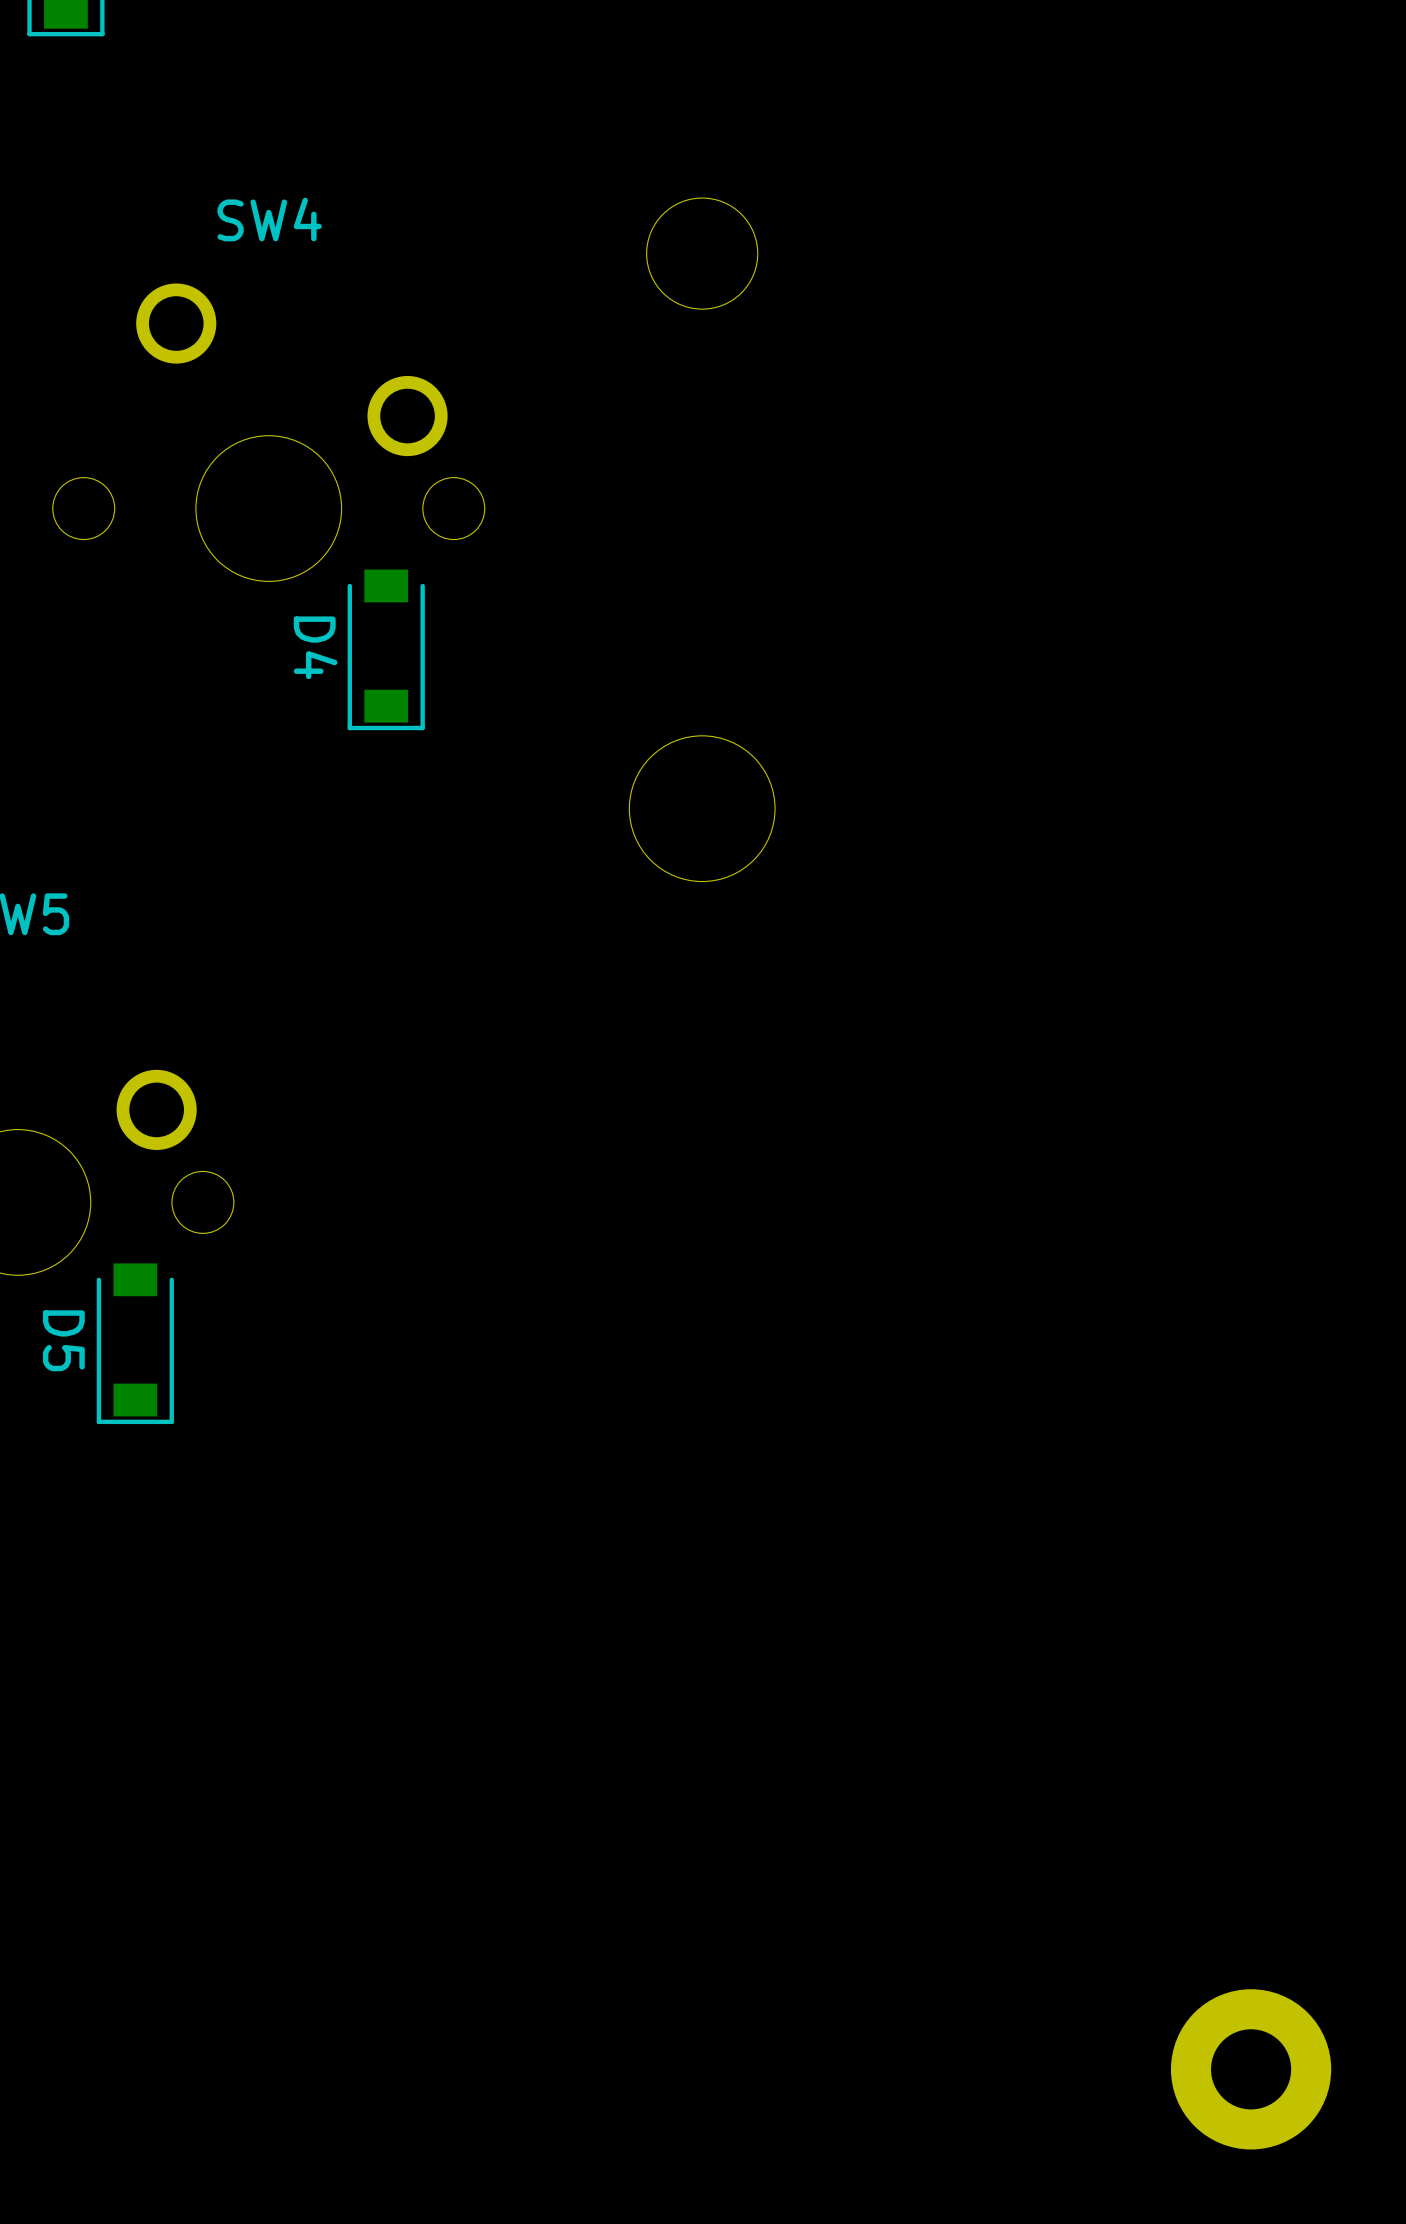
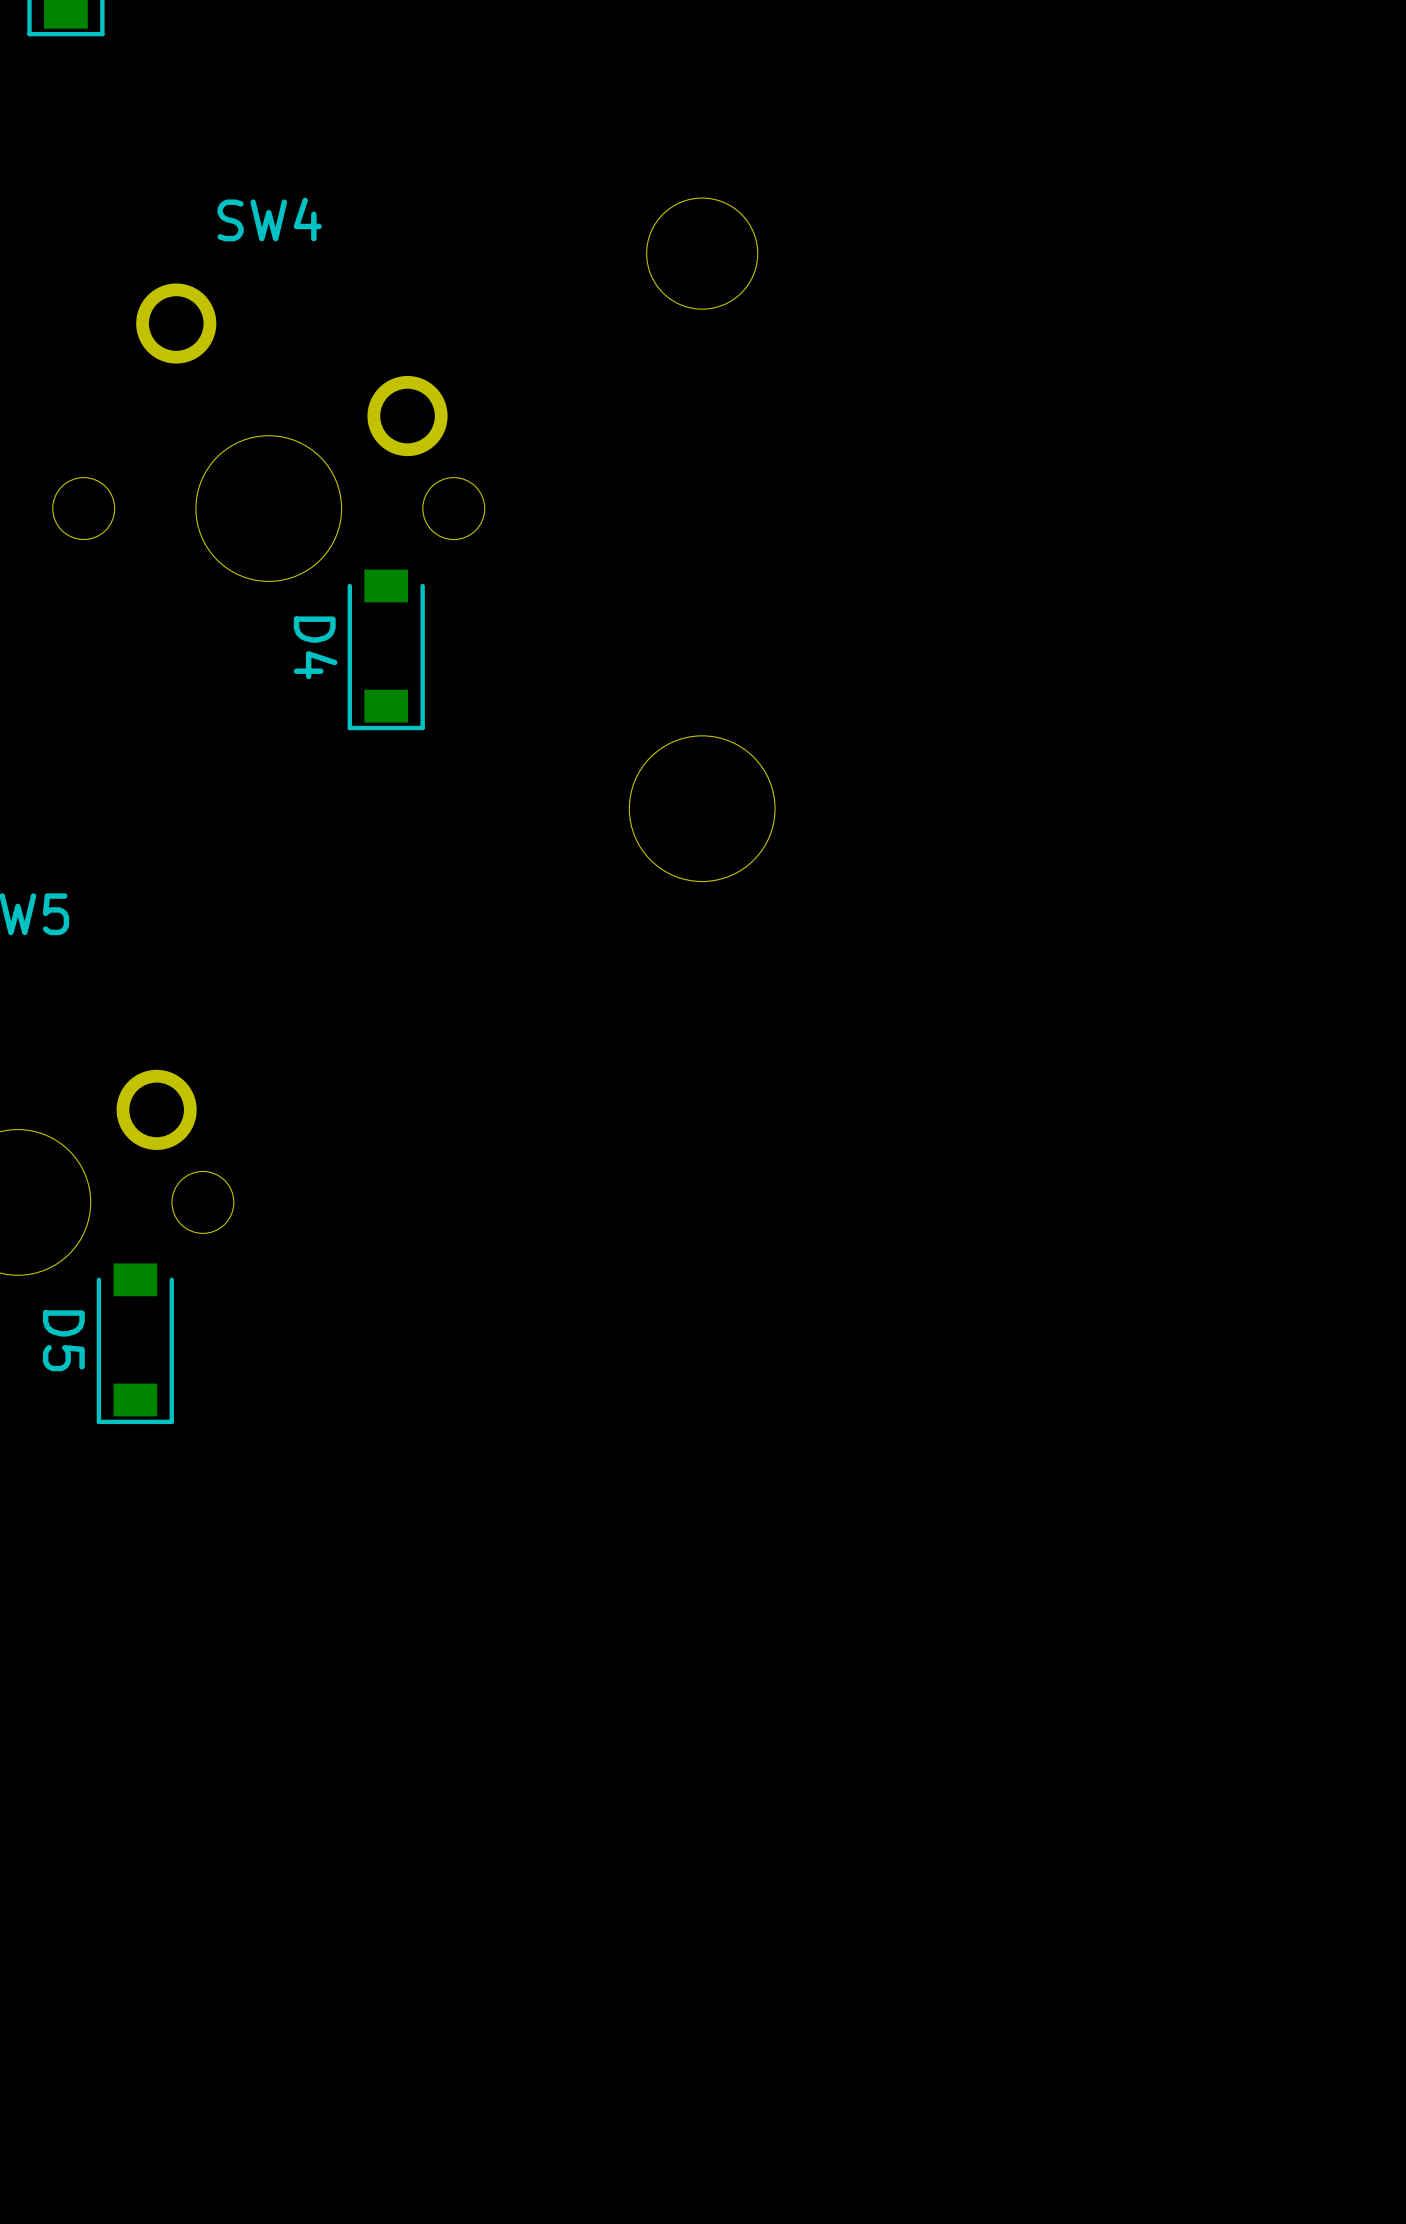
part: (1251, 2069) -> none

